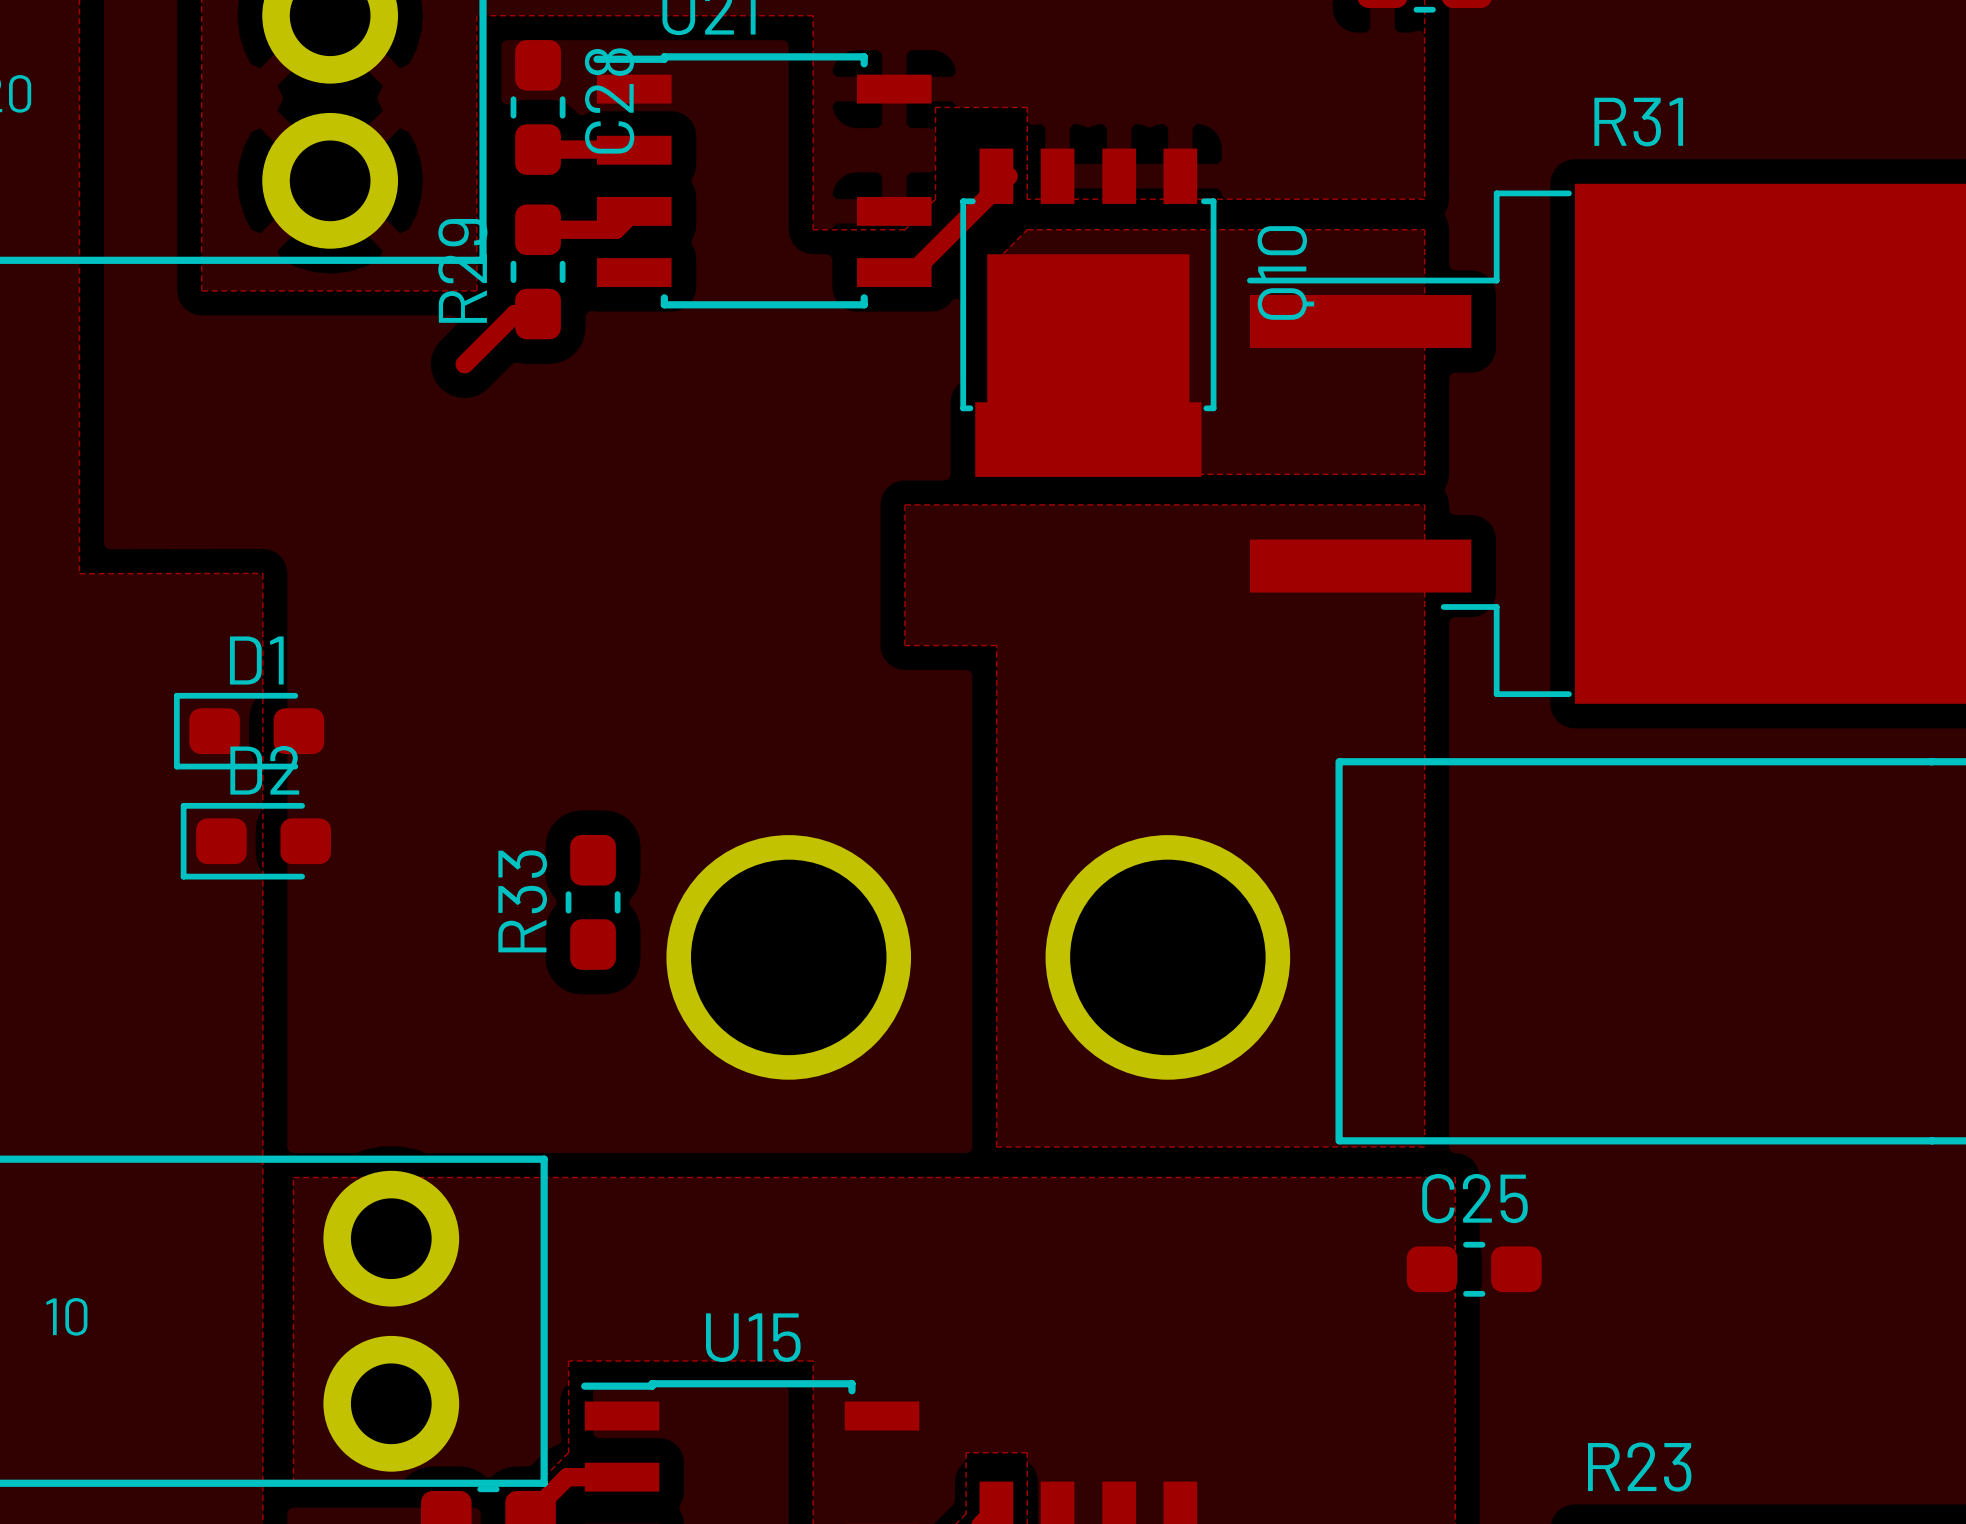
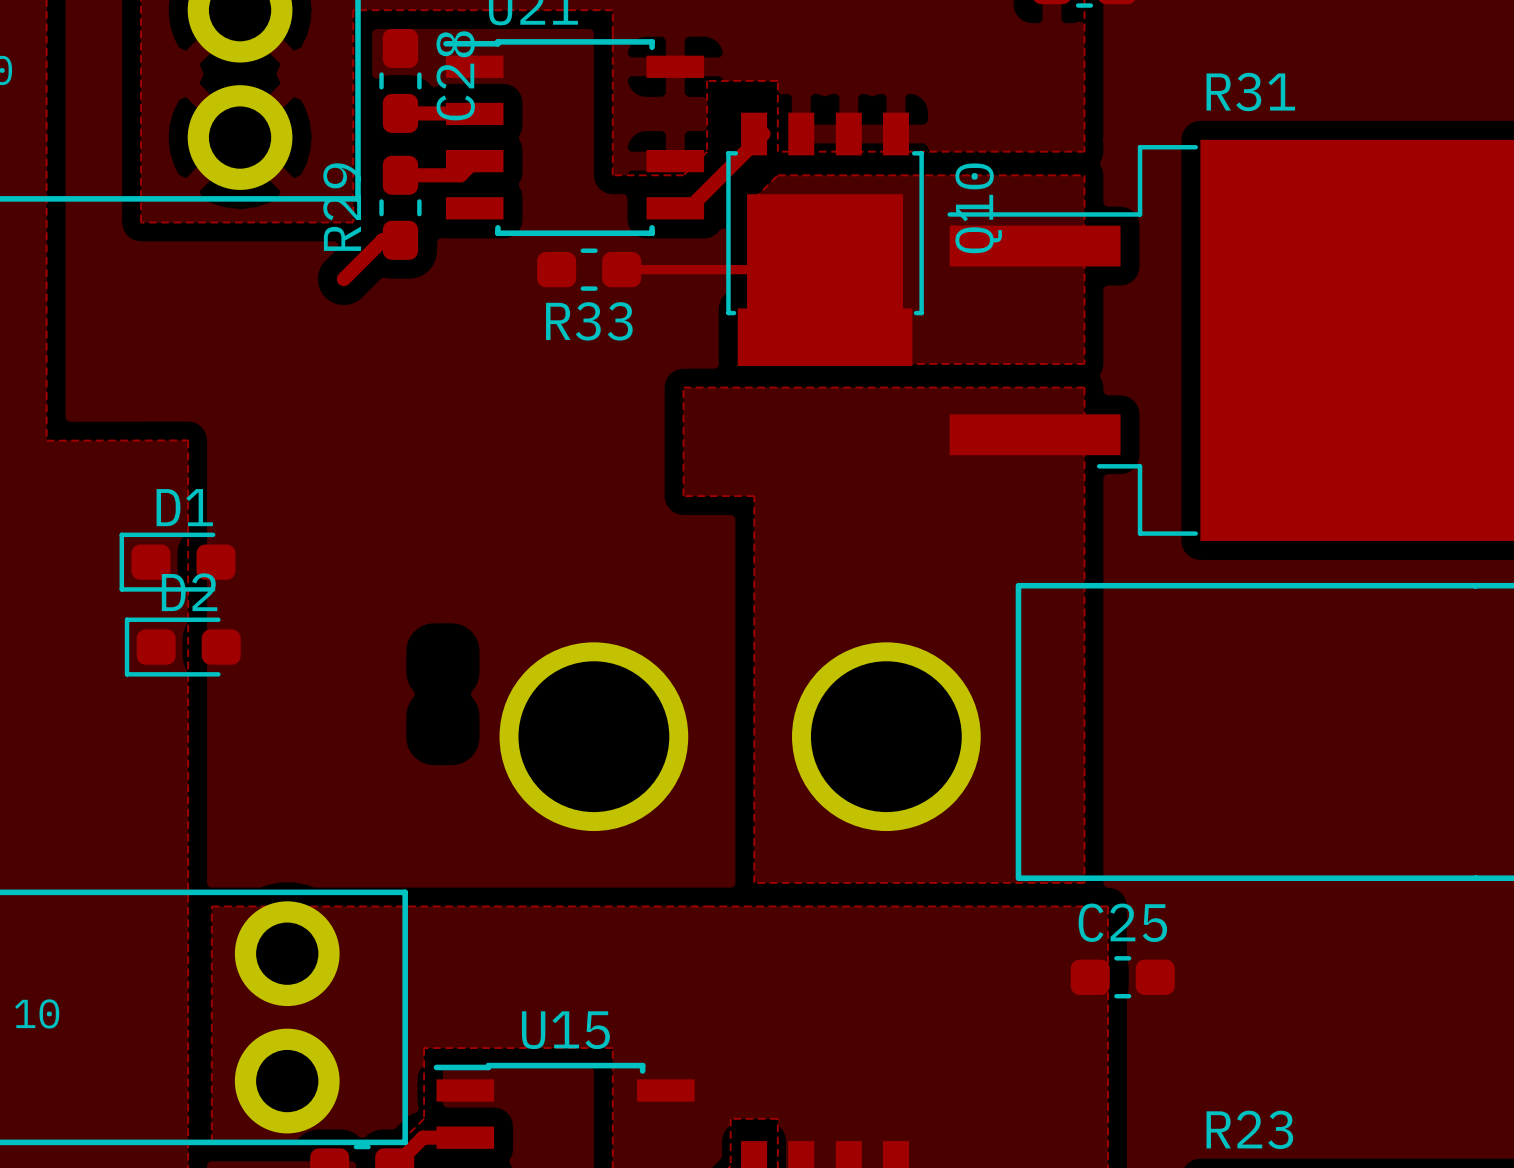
track: none -> (825, 255) (810, 269) (621, 269)
R33 name position: R33 (522, 901) -> R33 (589, 321)
R33 rotation: 0° (593, 902) -> 90° clockwise (589, 269)
R33 position: (593, 902) -> (589, 269)

